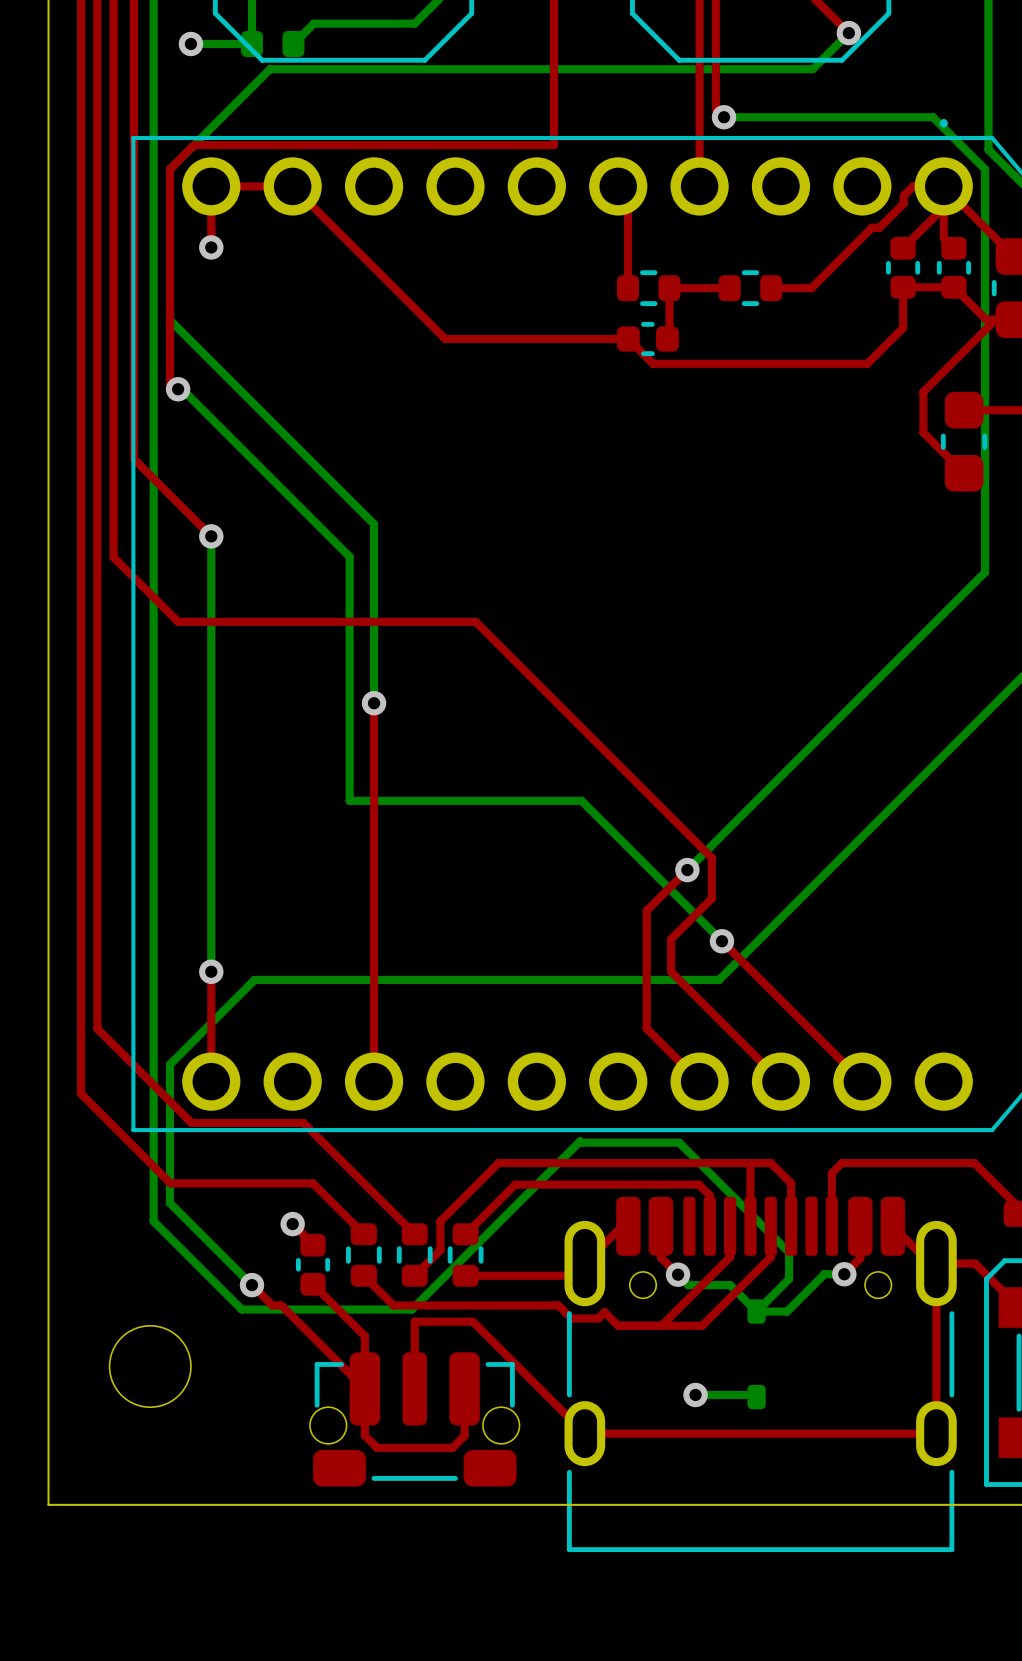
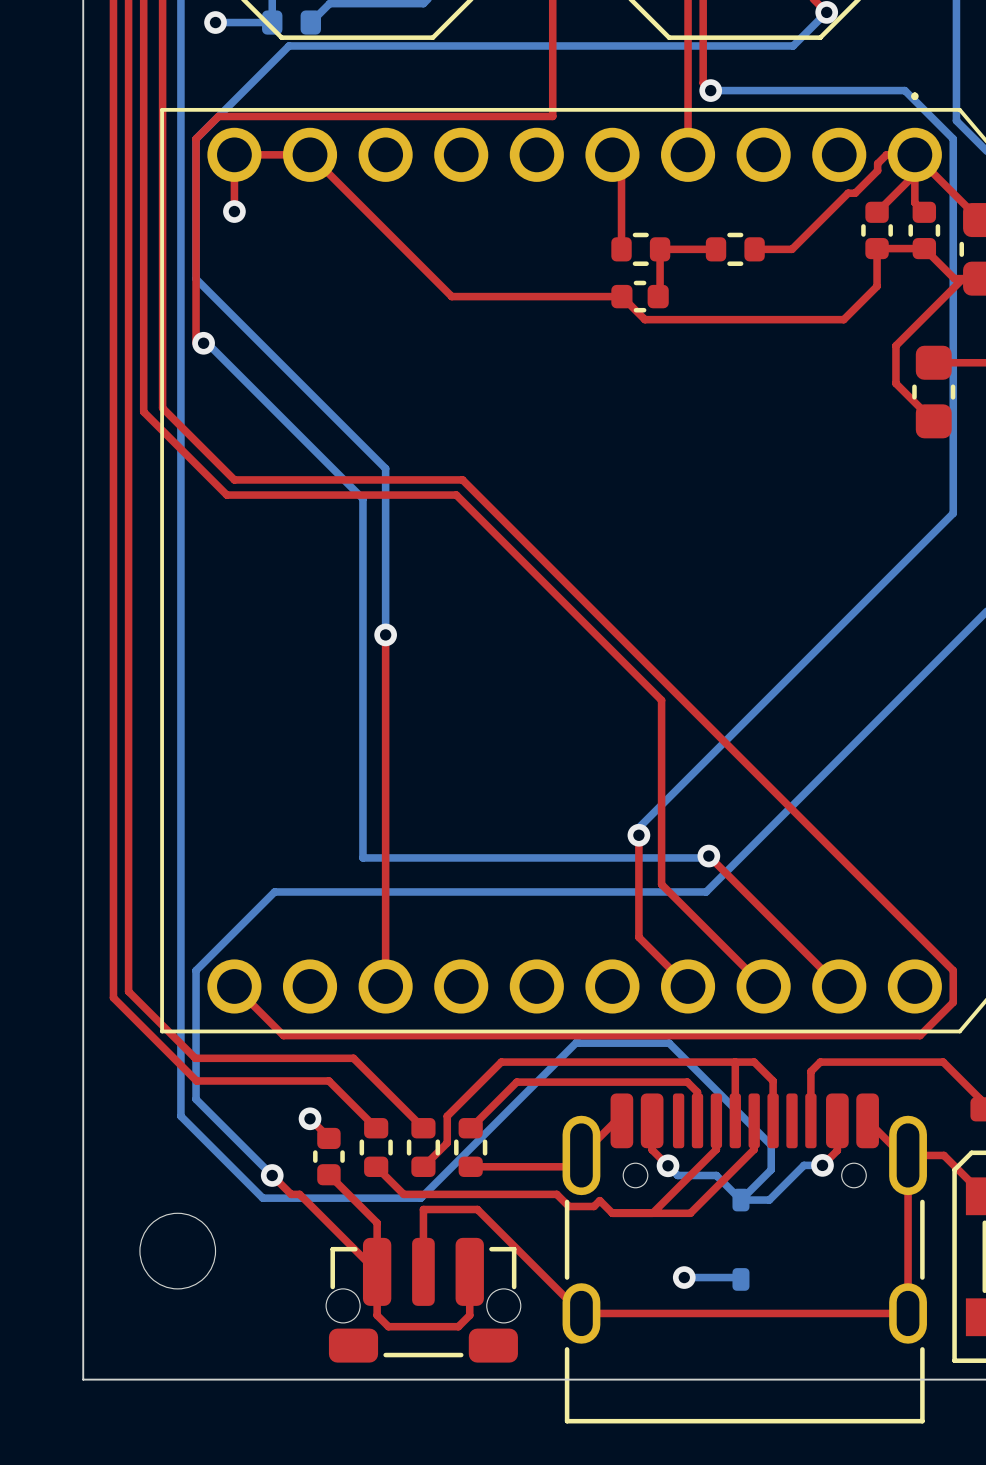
top track: (113, 463) (113, 557) (178, 621) (475, 621) (711, 857) (711, 898) (671, 939) -> (143, 411) (226, 495) (456, 495) (661, 700) (661, 854)
bottom track: (211, 536) (211, 971) -> none
via: (211, 536) -> none
bottom track: (349, 800) (581, 800) (721, 941) -> (362, 725) (362, 857) (706, 857) (708, 856)
top track: (687, 870) (646, 910) (646, 918) -> none
bottom track: none -> (676, 789) (638, 827) (638, 835)
via position: (687, 870) -> (638, 835)
top track: (211, 971) (211, 1081) -> (234, 479) (462, 479) (953, 970) (953, 1002) (920, 1035) (283, 1035) (234, 986)
via: (211, 971) -> none
top track: (97, 1028) (191, 1122) (303, 1122) (339, 1158) -> (128, 937) (128, 991) (195, 1058) (353, 1058)

